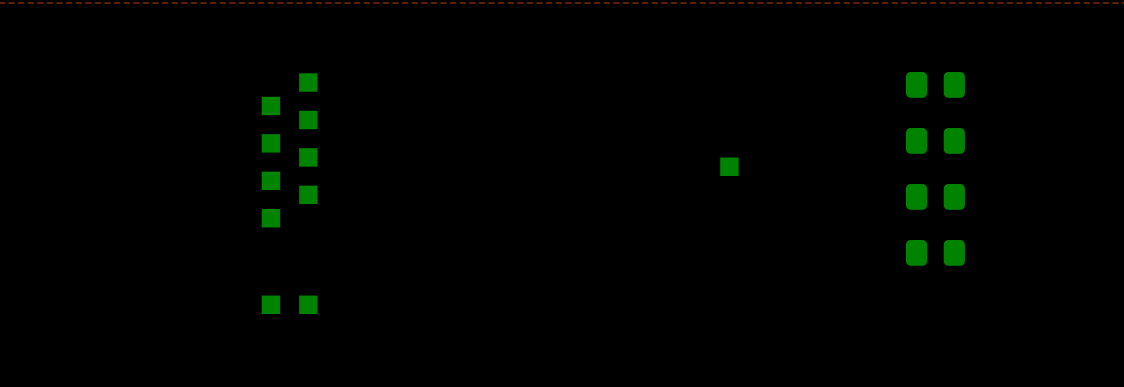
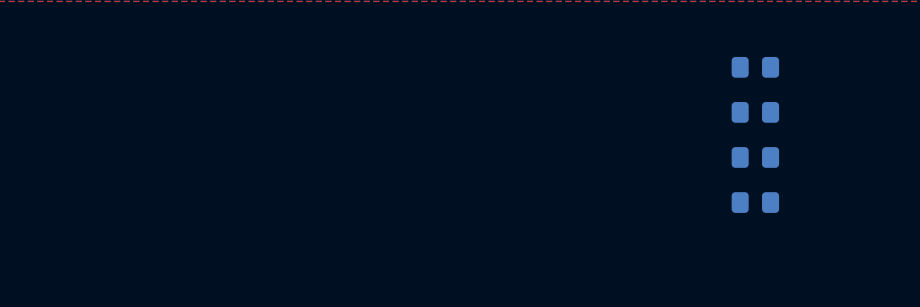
part: (308, 82) -> none
part: (270, 105) -> none
part: (308, 119) -> none
part: (270, 143) -> none
part: (308, 157) -> none
part: (729, 166) -> none
part: (270, 180) -> none
part: (308, 194) -> none
part: (270, 218) -> none
part: (270, 304) -> none
part: (308, 304) -> none

